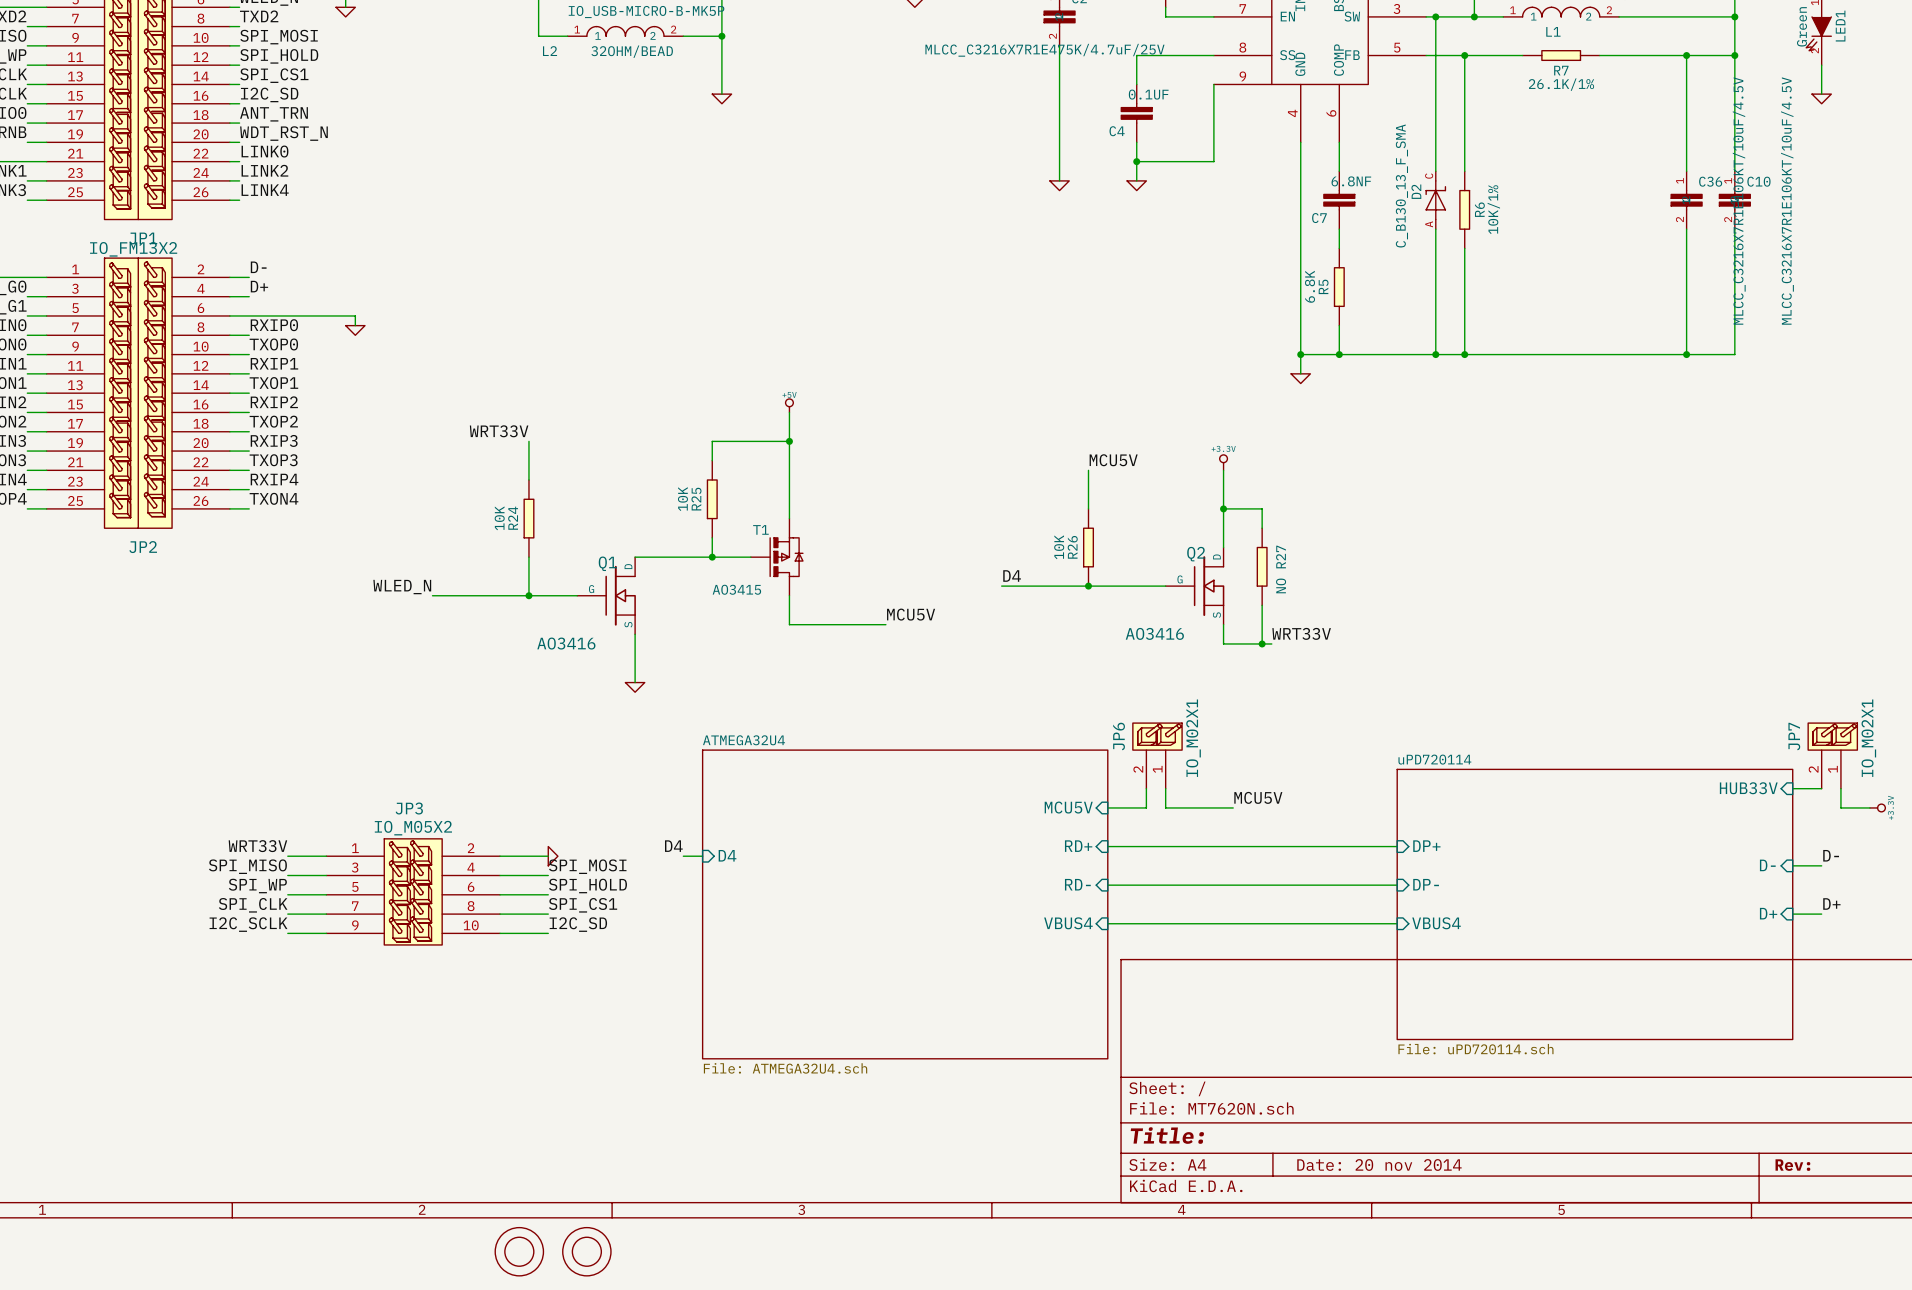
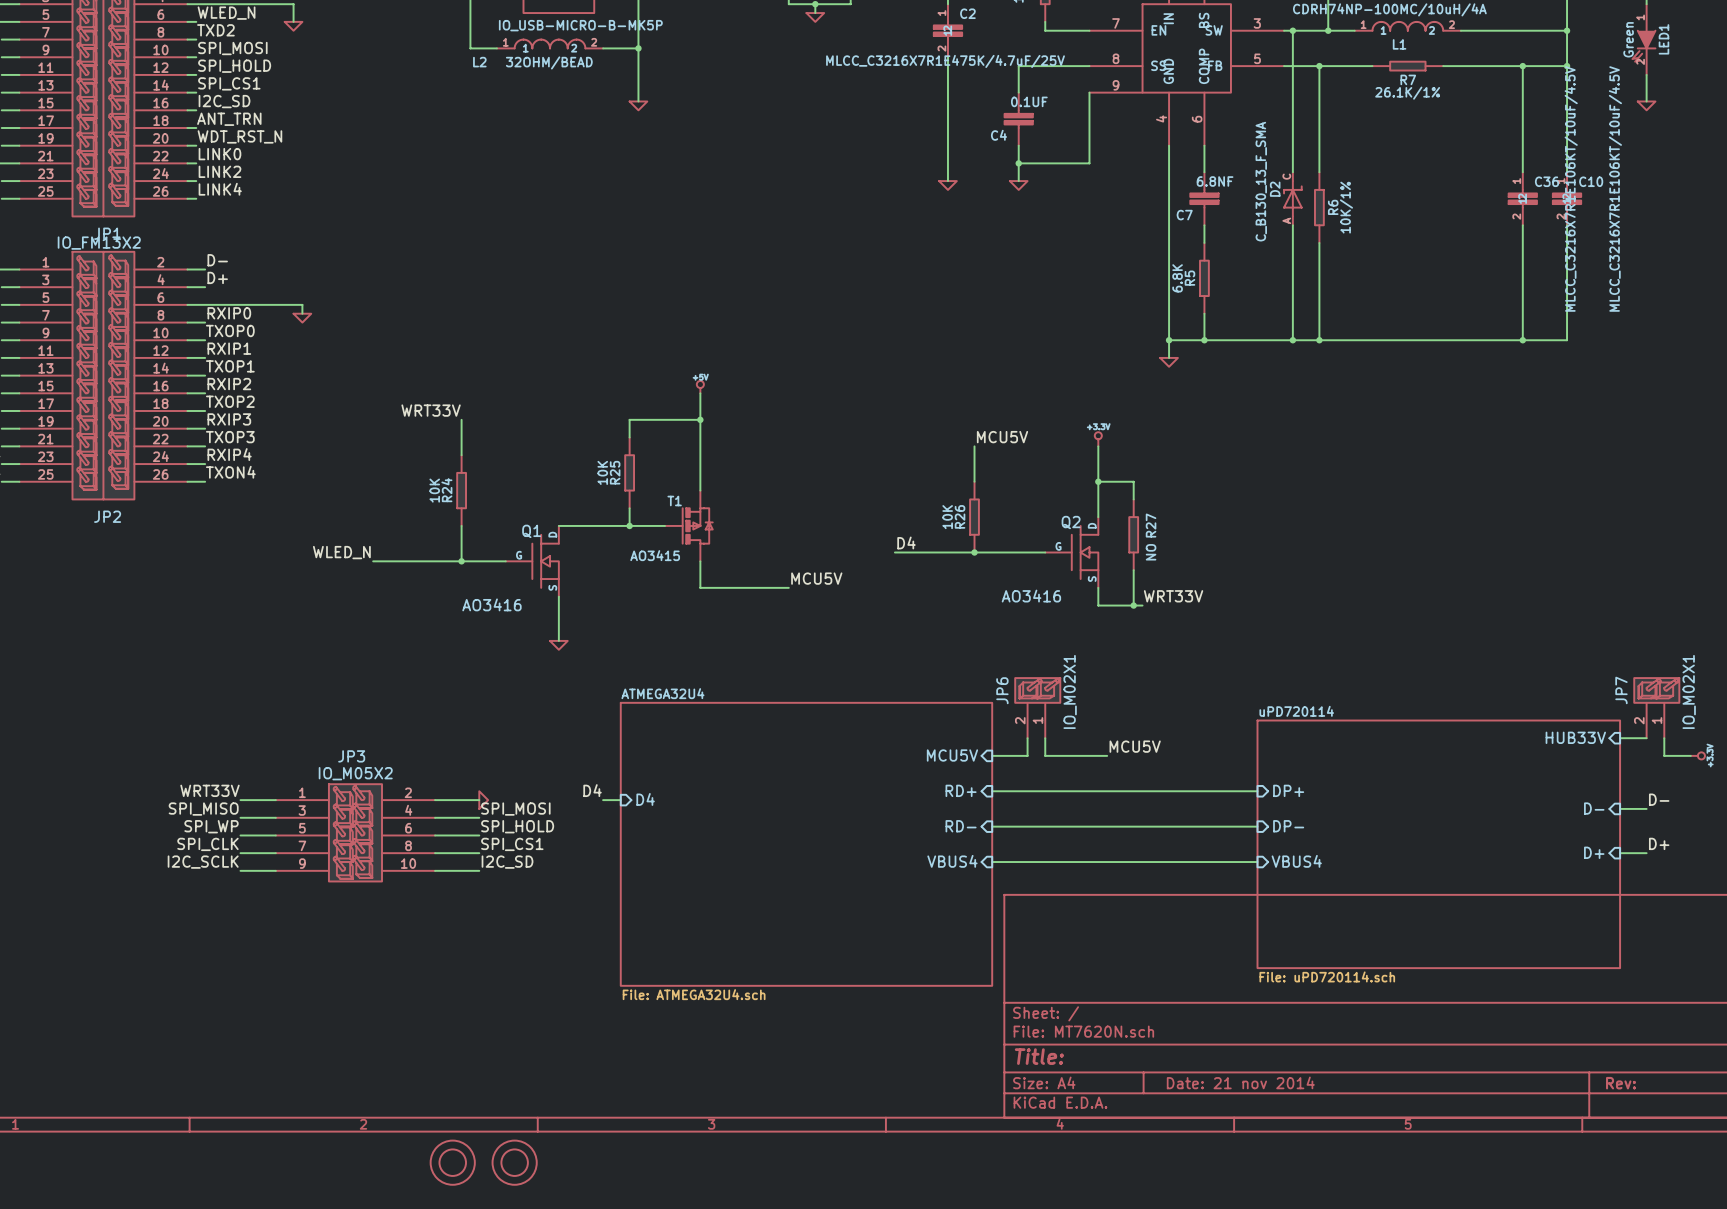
title block: Date: 20 nov 2014 (1379, 1164) -> Date: 21 nov 2014 (1240, 1082)

